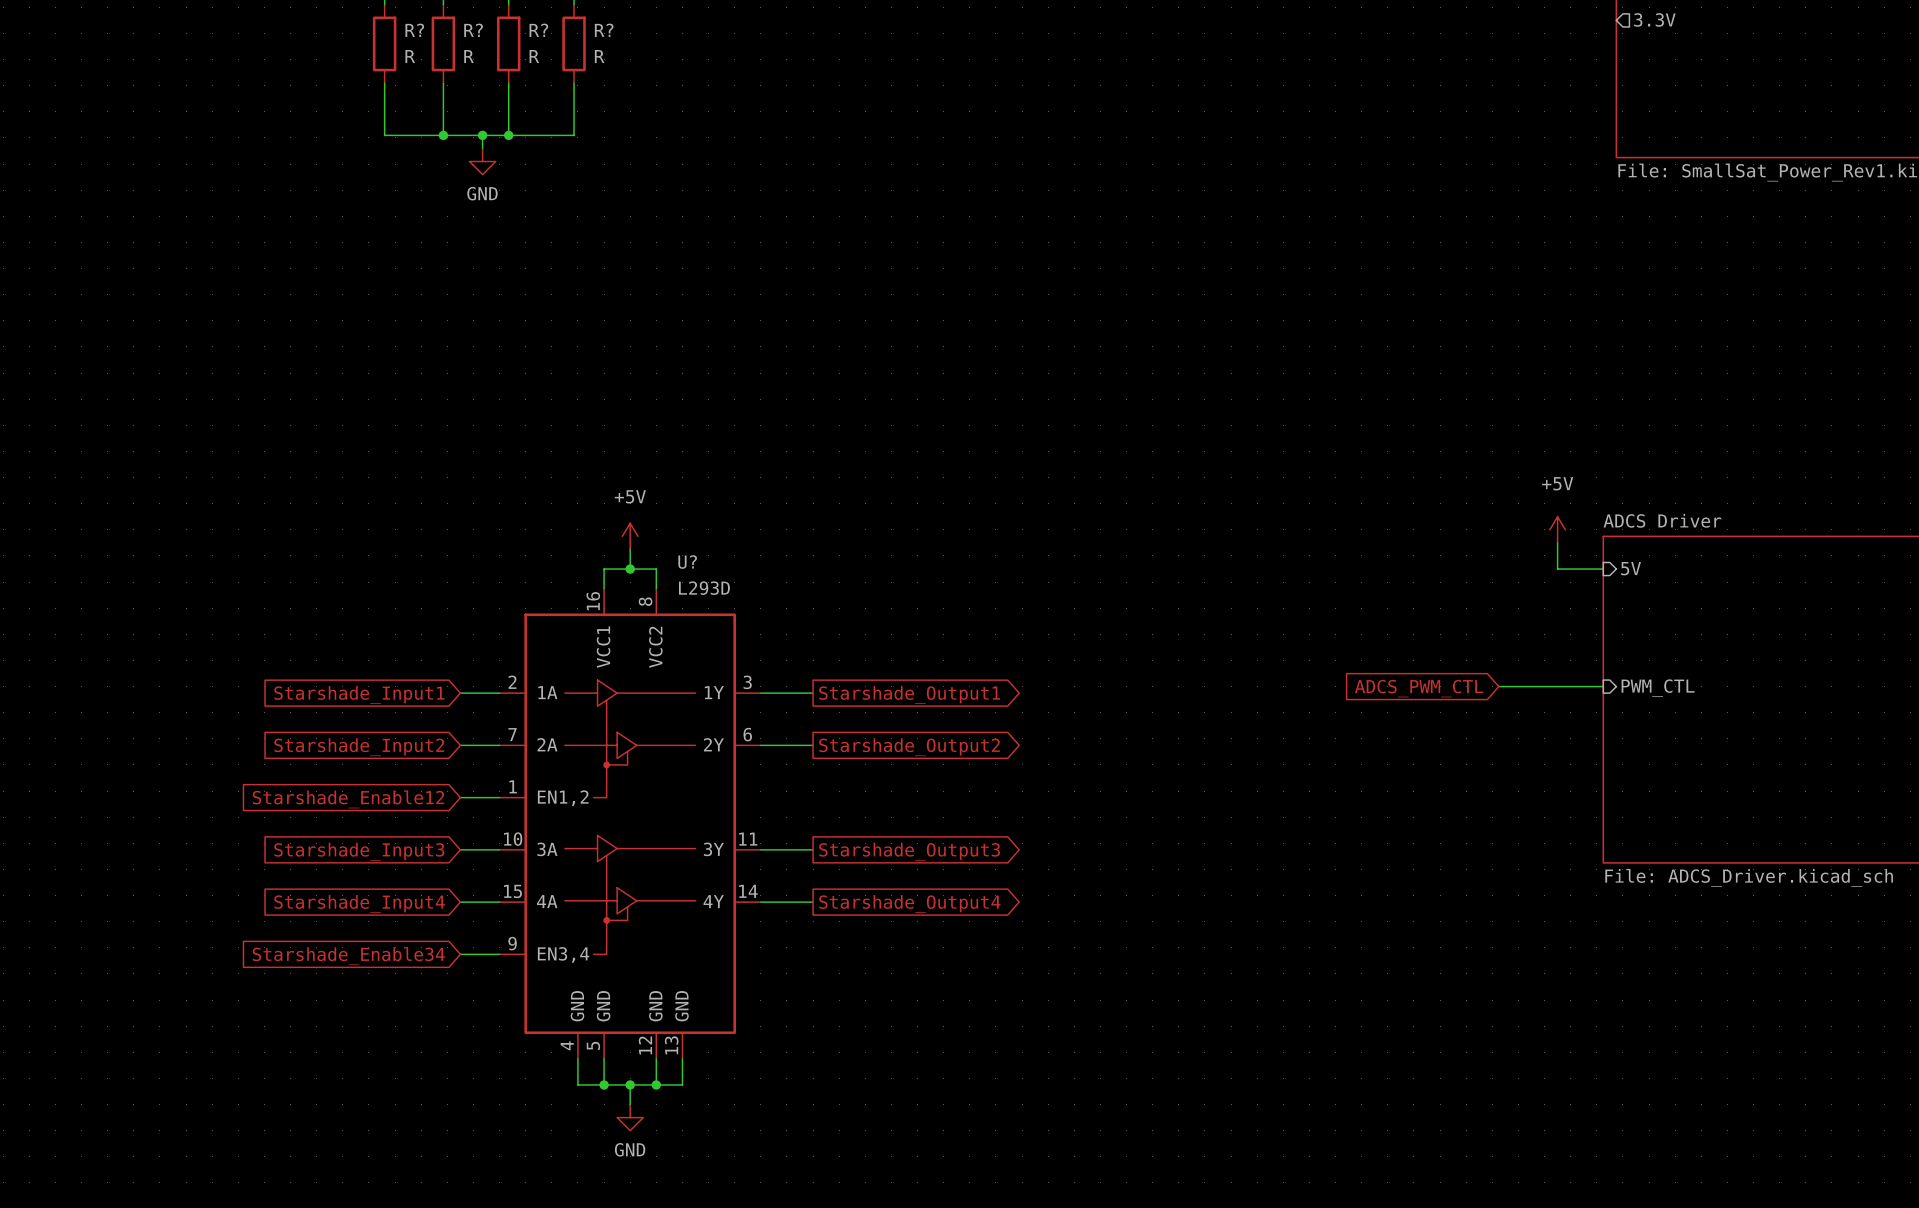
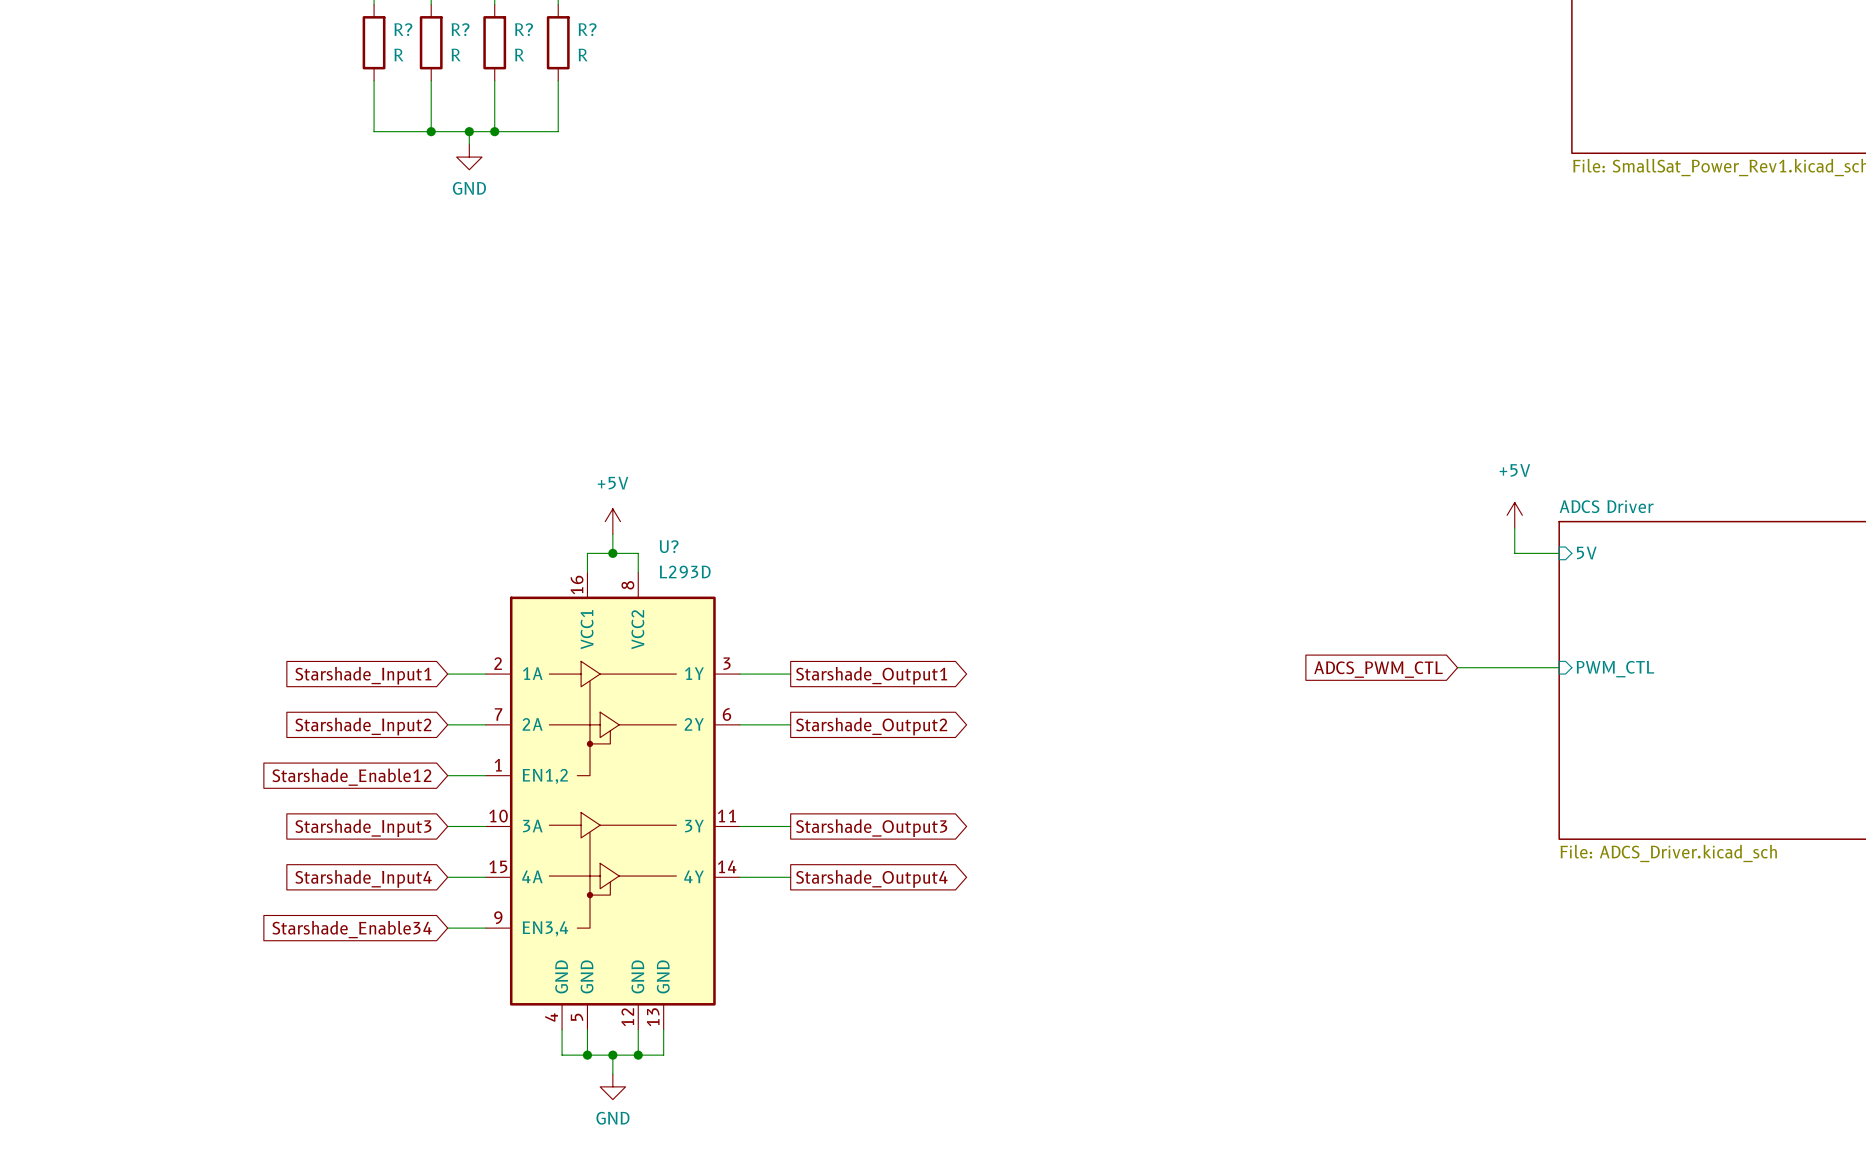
sheet pin: 3.3V (1654, 19) -> none

